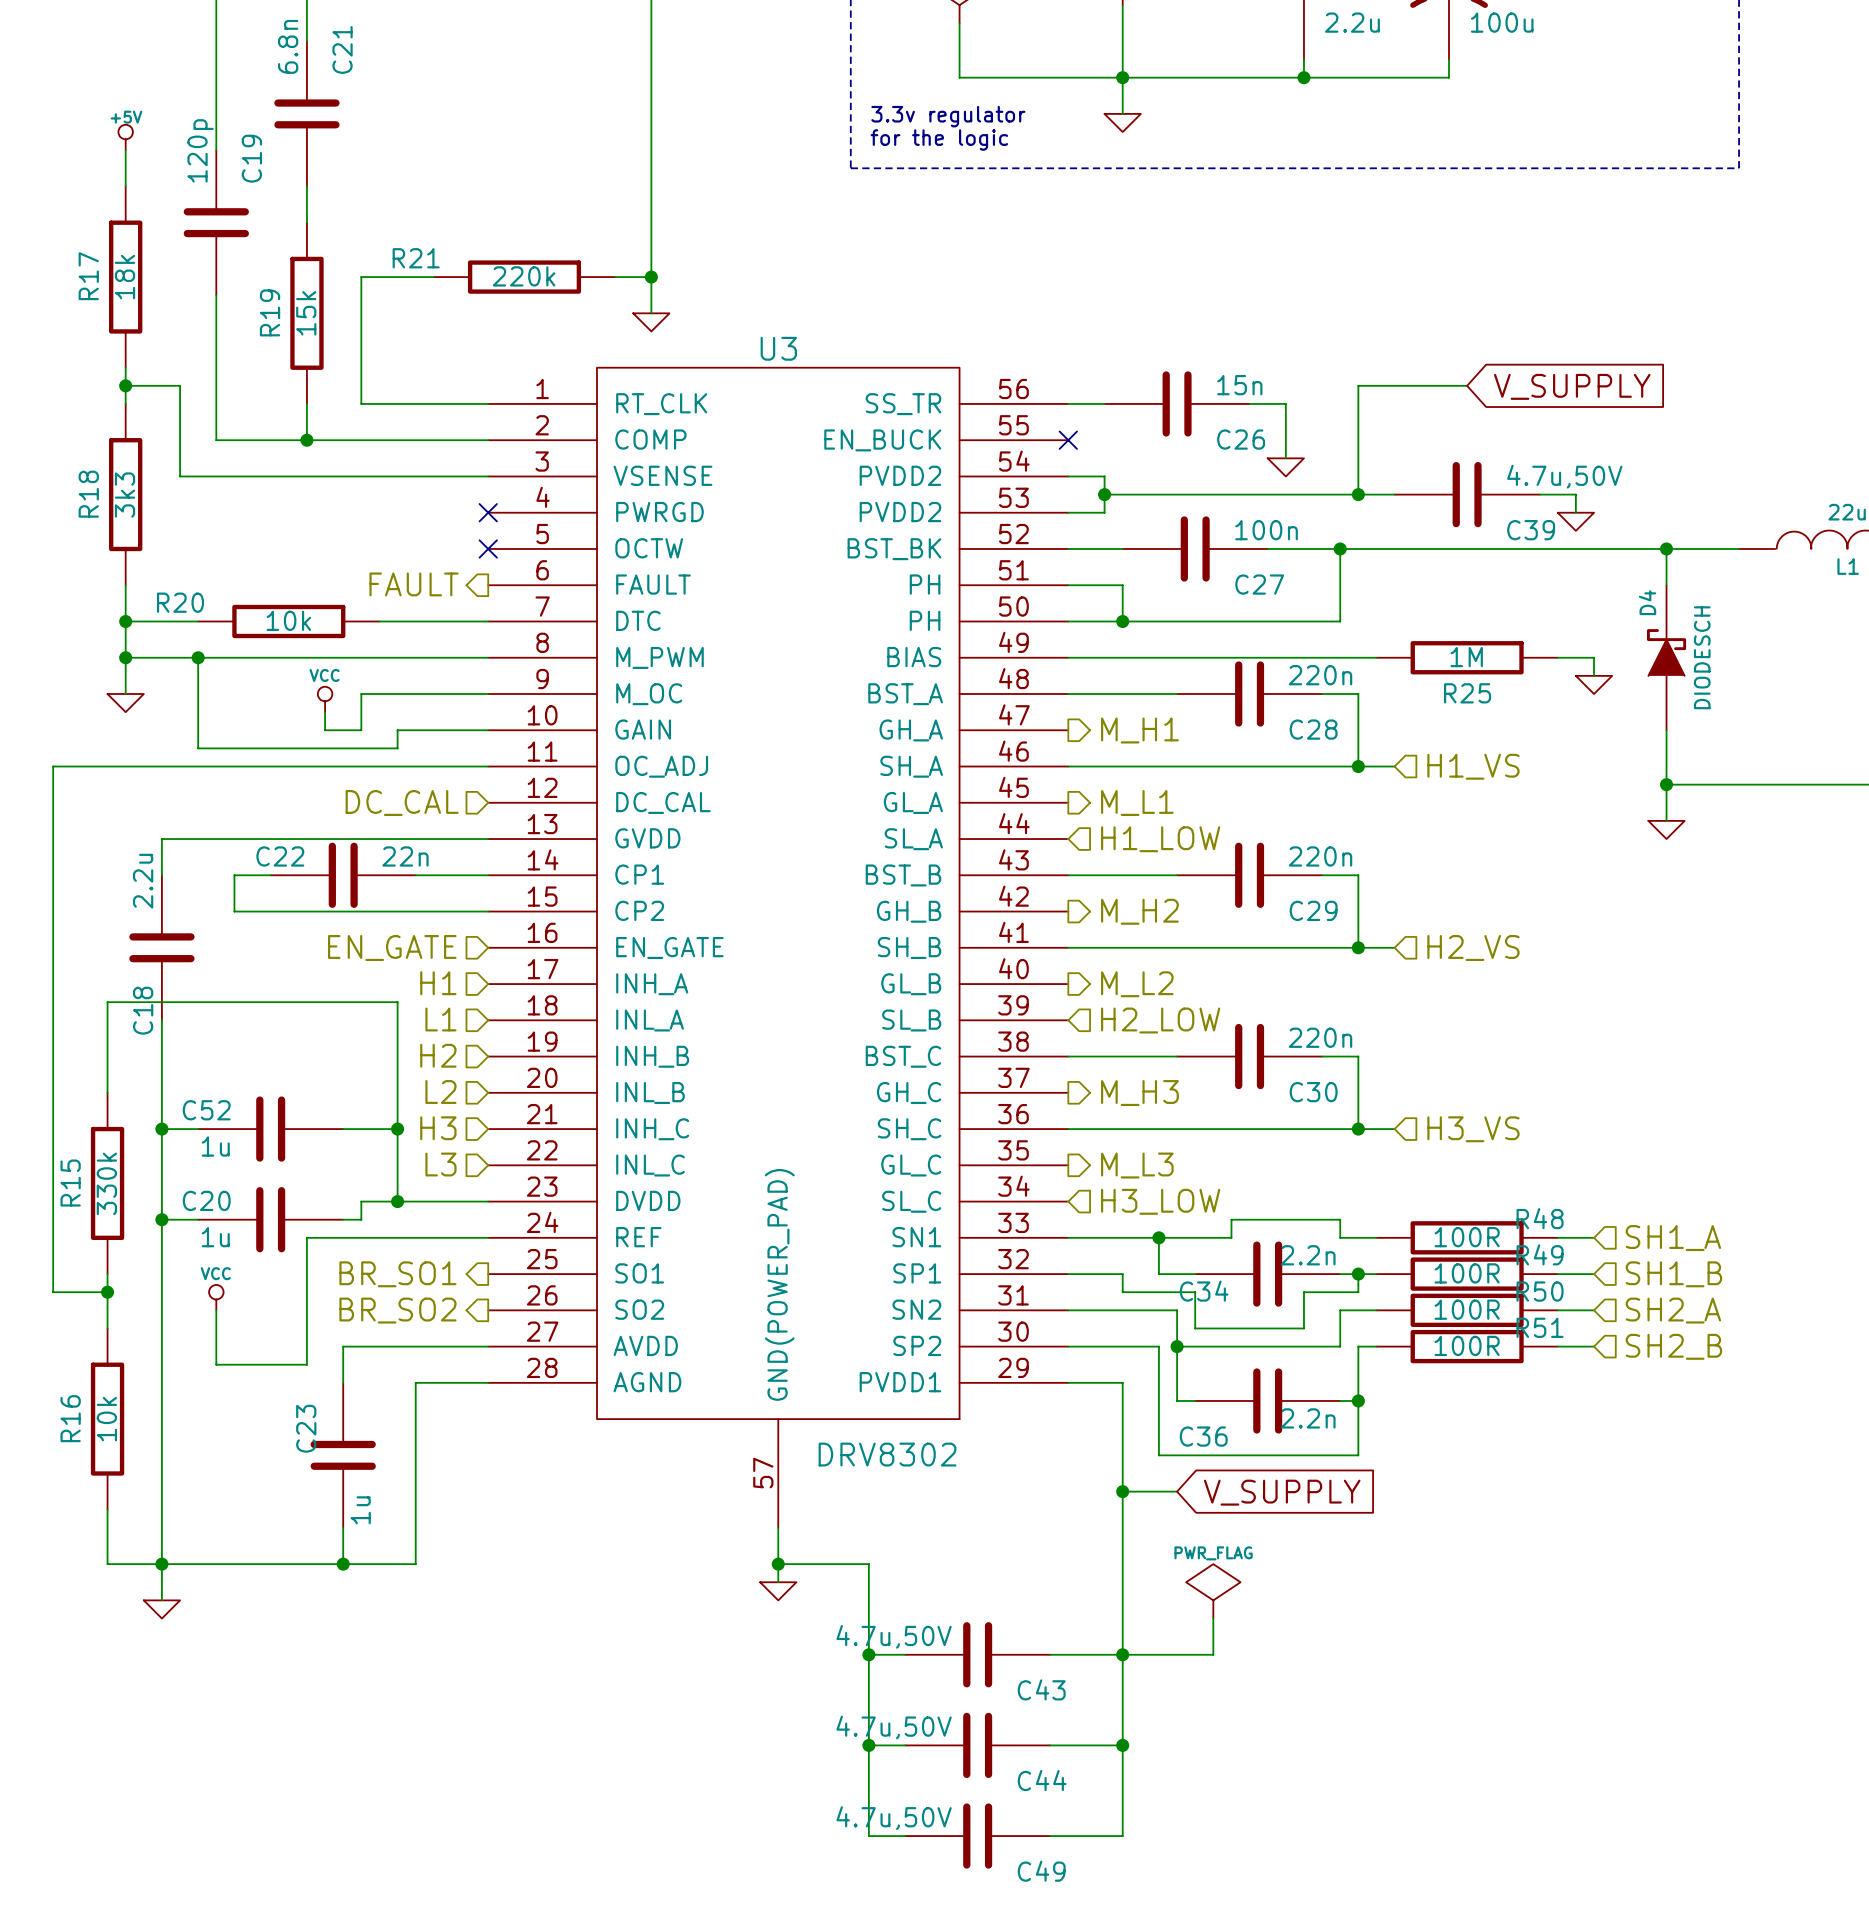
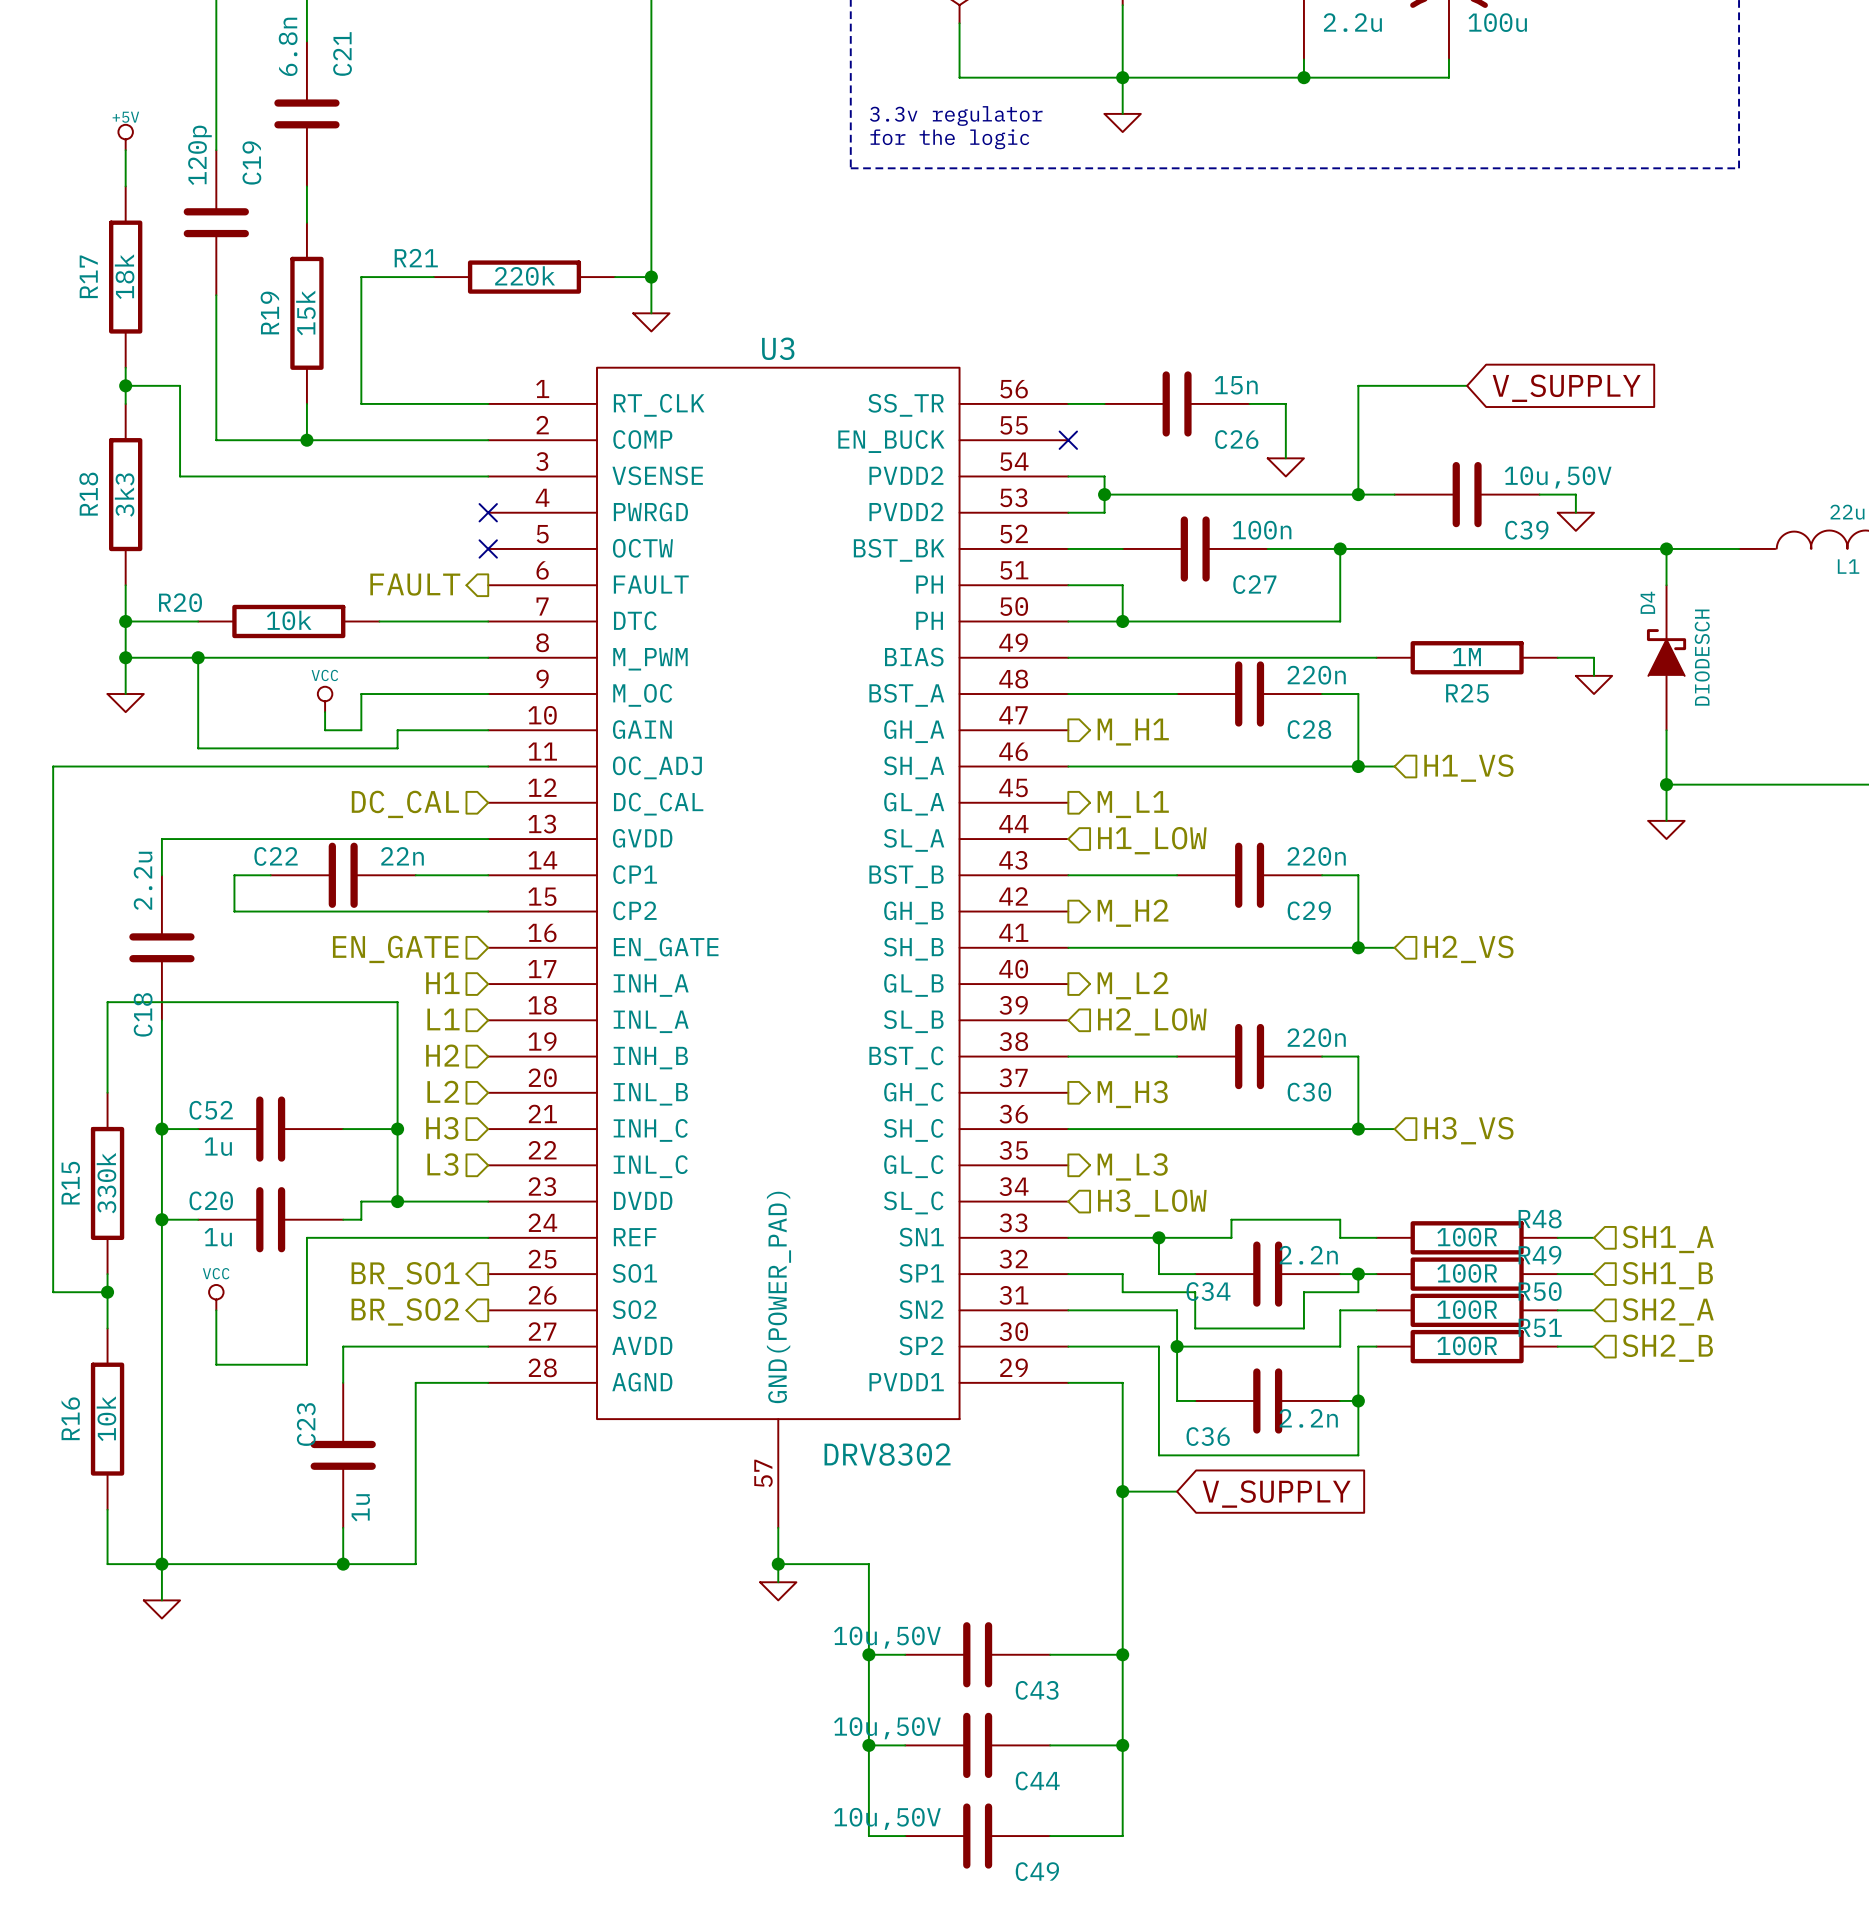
C39 value: 4.7u,50V (1564, 476) -> 10u,50V (1558, 477)
power symbol: PWR_FLAG (1213, 1591) -> none
wire: (1213, 1618) (1213, 1654) (1122, 1654) -> none
C43 value: 4.7u,50V (894, 1636) -> 10u,50V (887, 1637)
C44 value: 4.7u,50V (894, 1727) -> 10u,50V (887, 1728)
C49 value: 4.7u,50V (894, 1818) -> 10u,50V (887, 1818)

